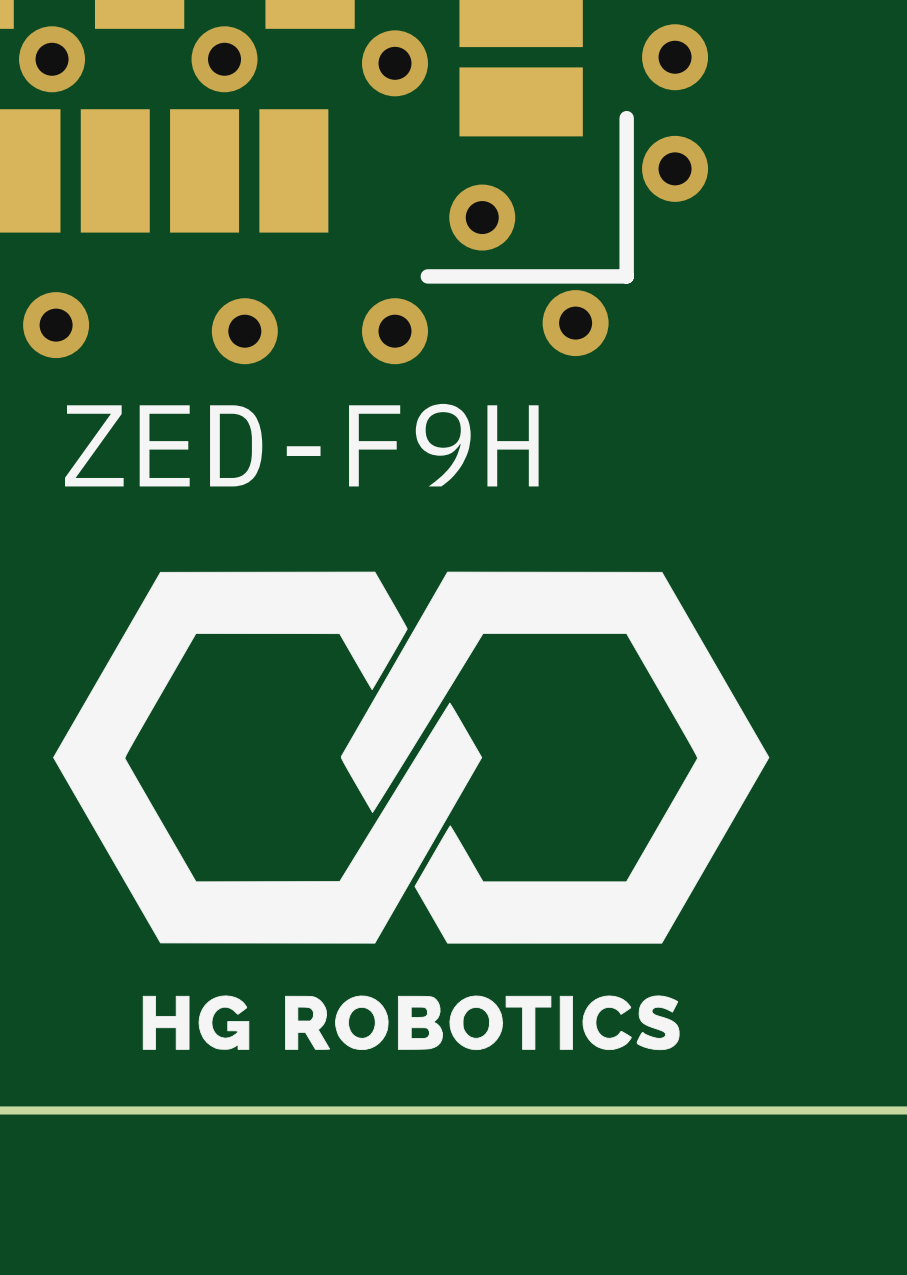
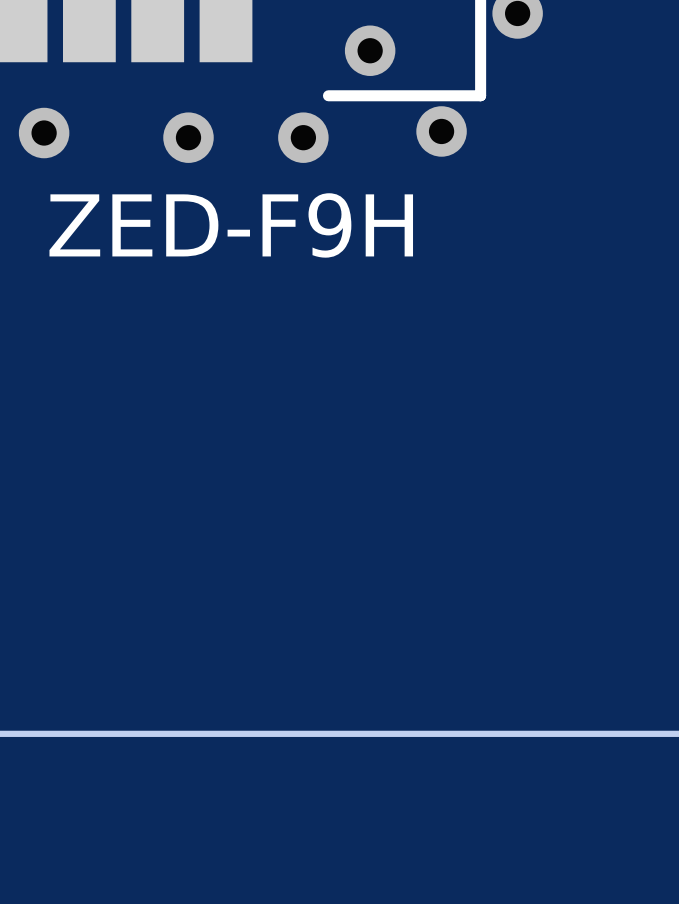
drawing: [53, 571, 770, 1051] -> none

